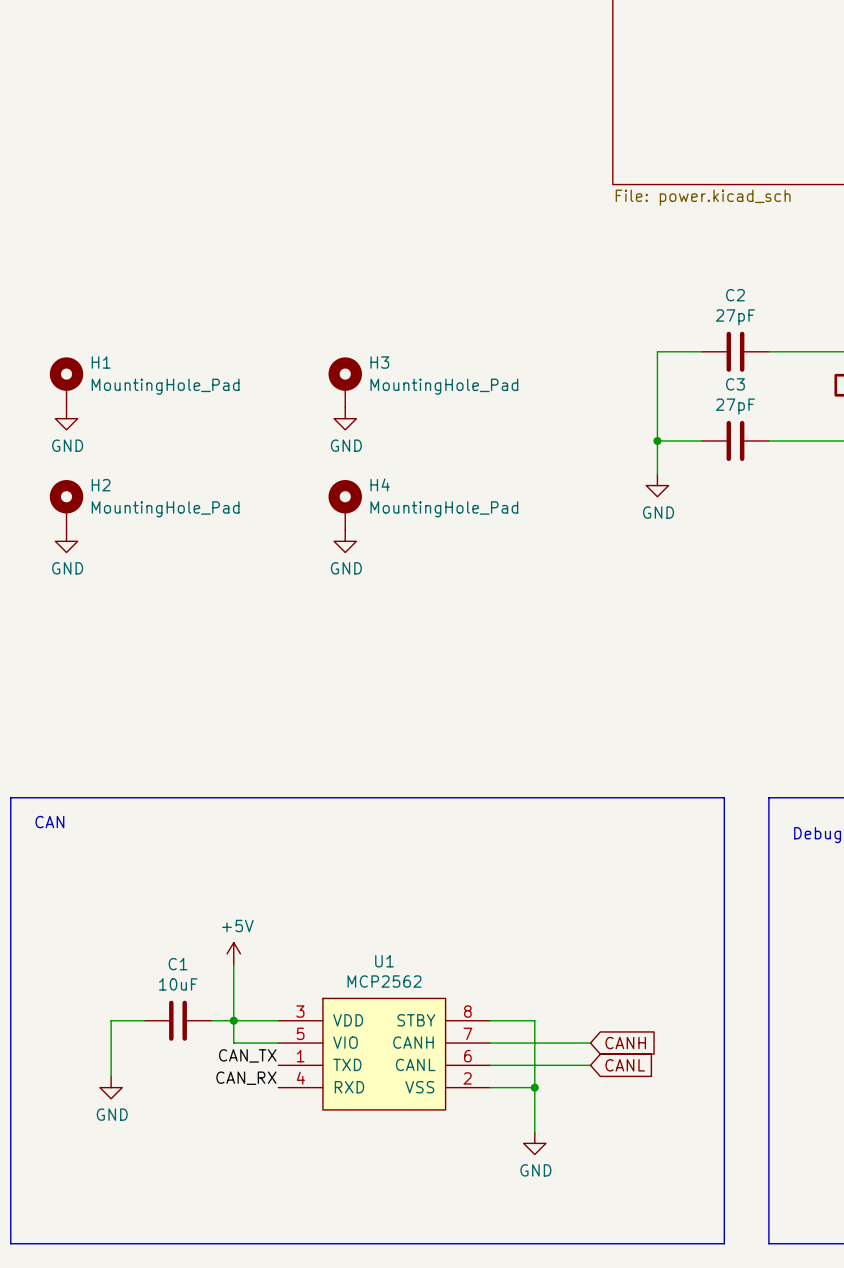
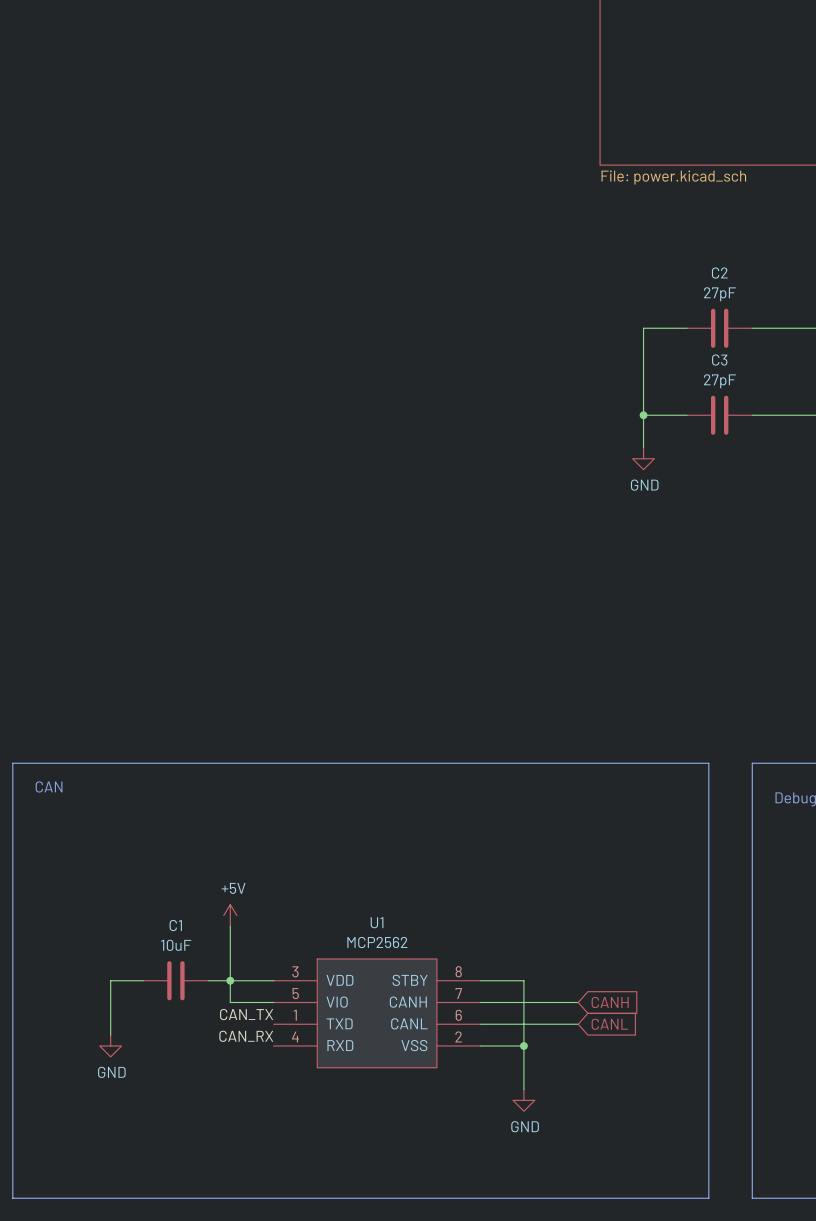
H1: MountingHole_Pad (66, 382) -> none
H3: MountingHole_Pad (345, 382) -> none
power symbol: GND (66, 418) -> none
power symbol: GND (345, 418) -> none
H2: MountingHole_Pad (66, 505) -> none
H4: MountingHole_Pad (345, 505) -> none
power symbol: GND (66, 541) -> none
power symbol: GND (345, 541) -> none

